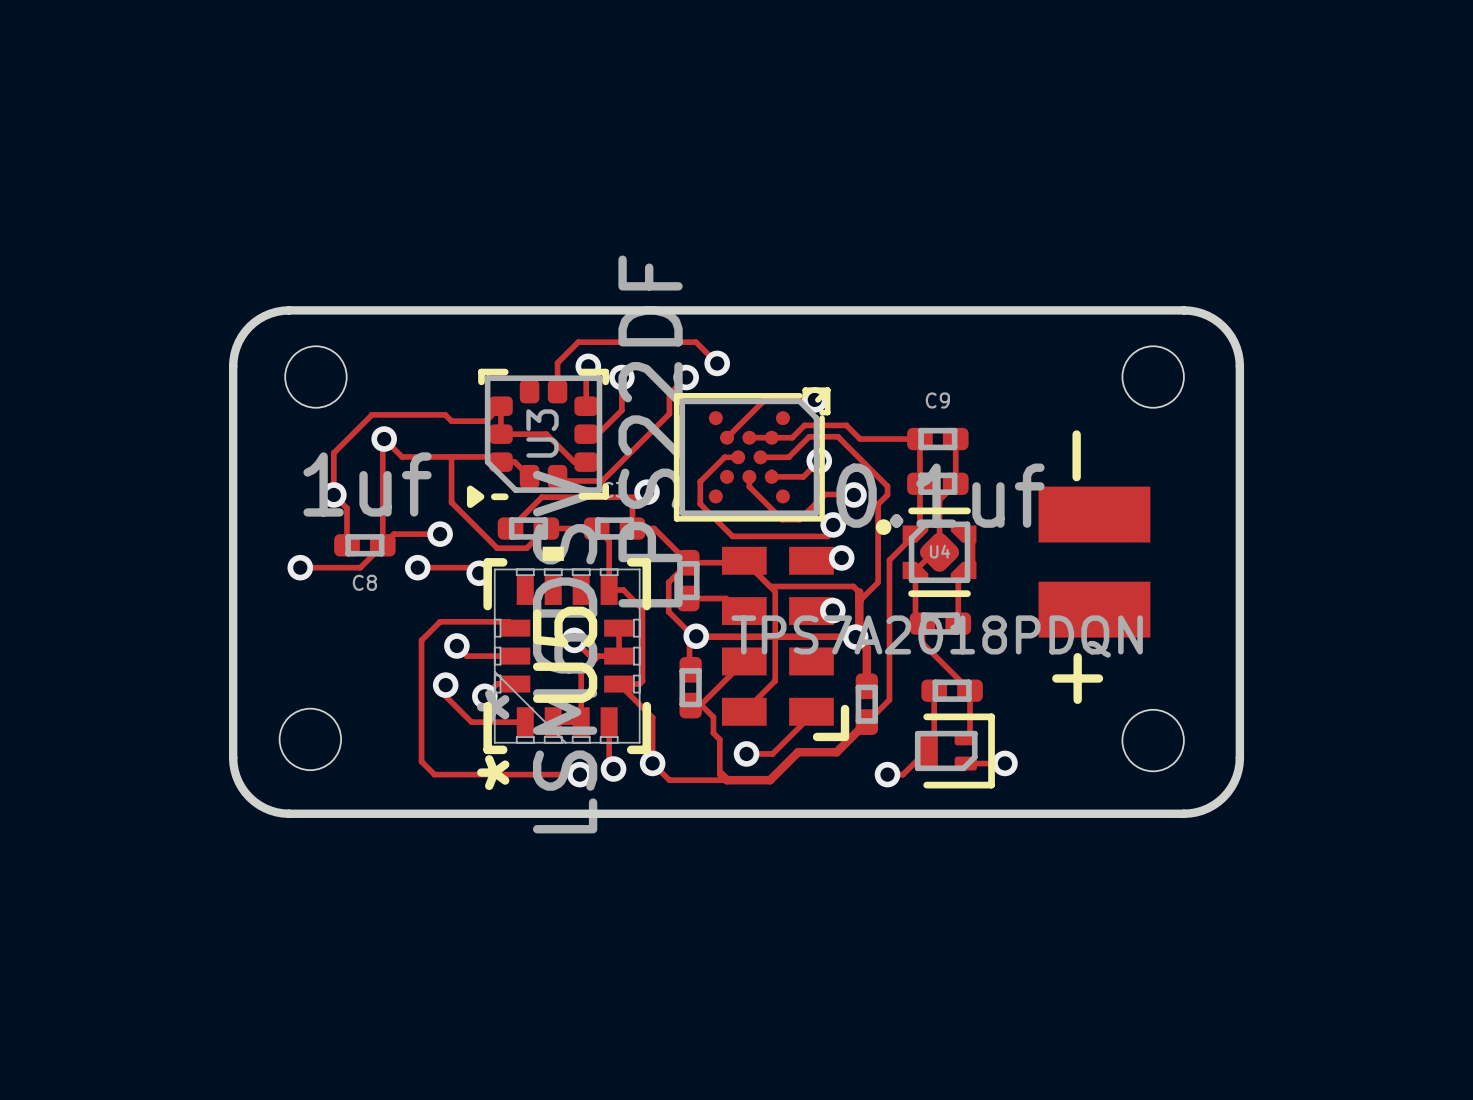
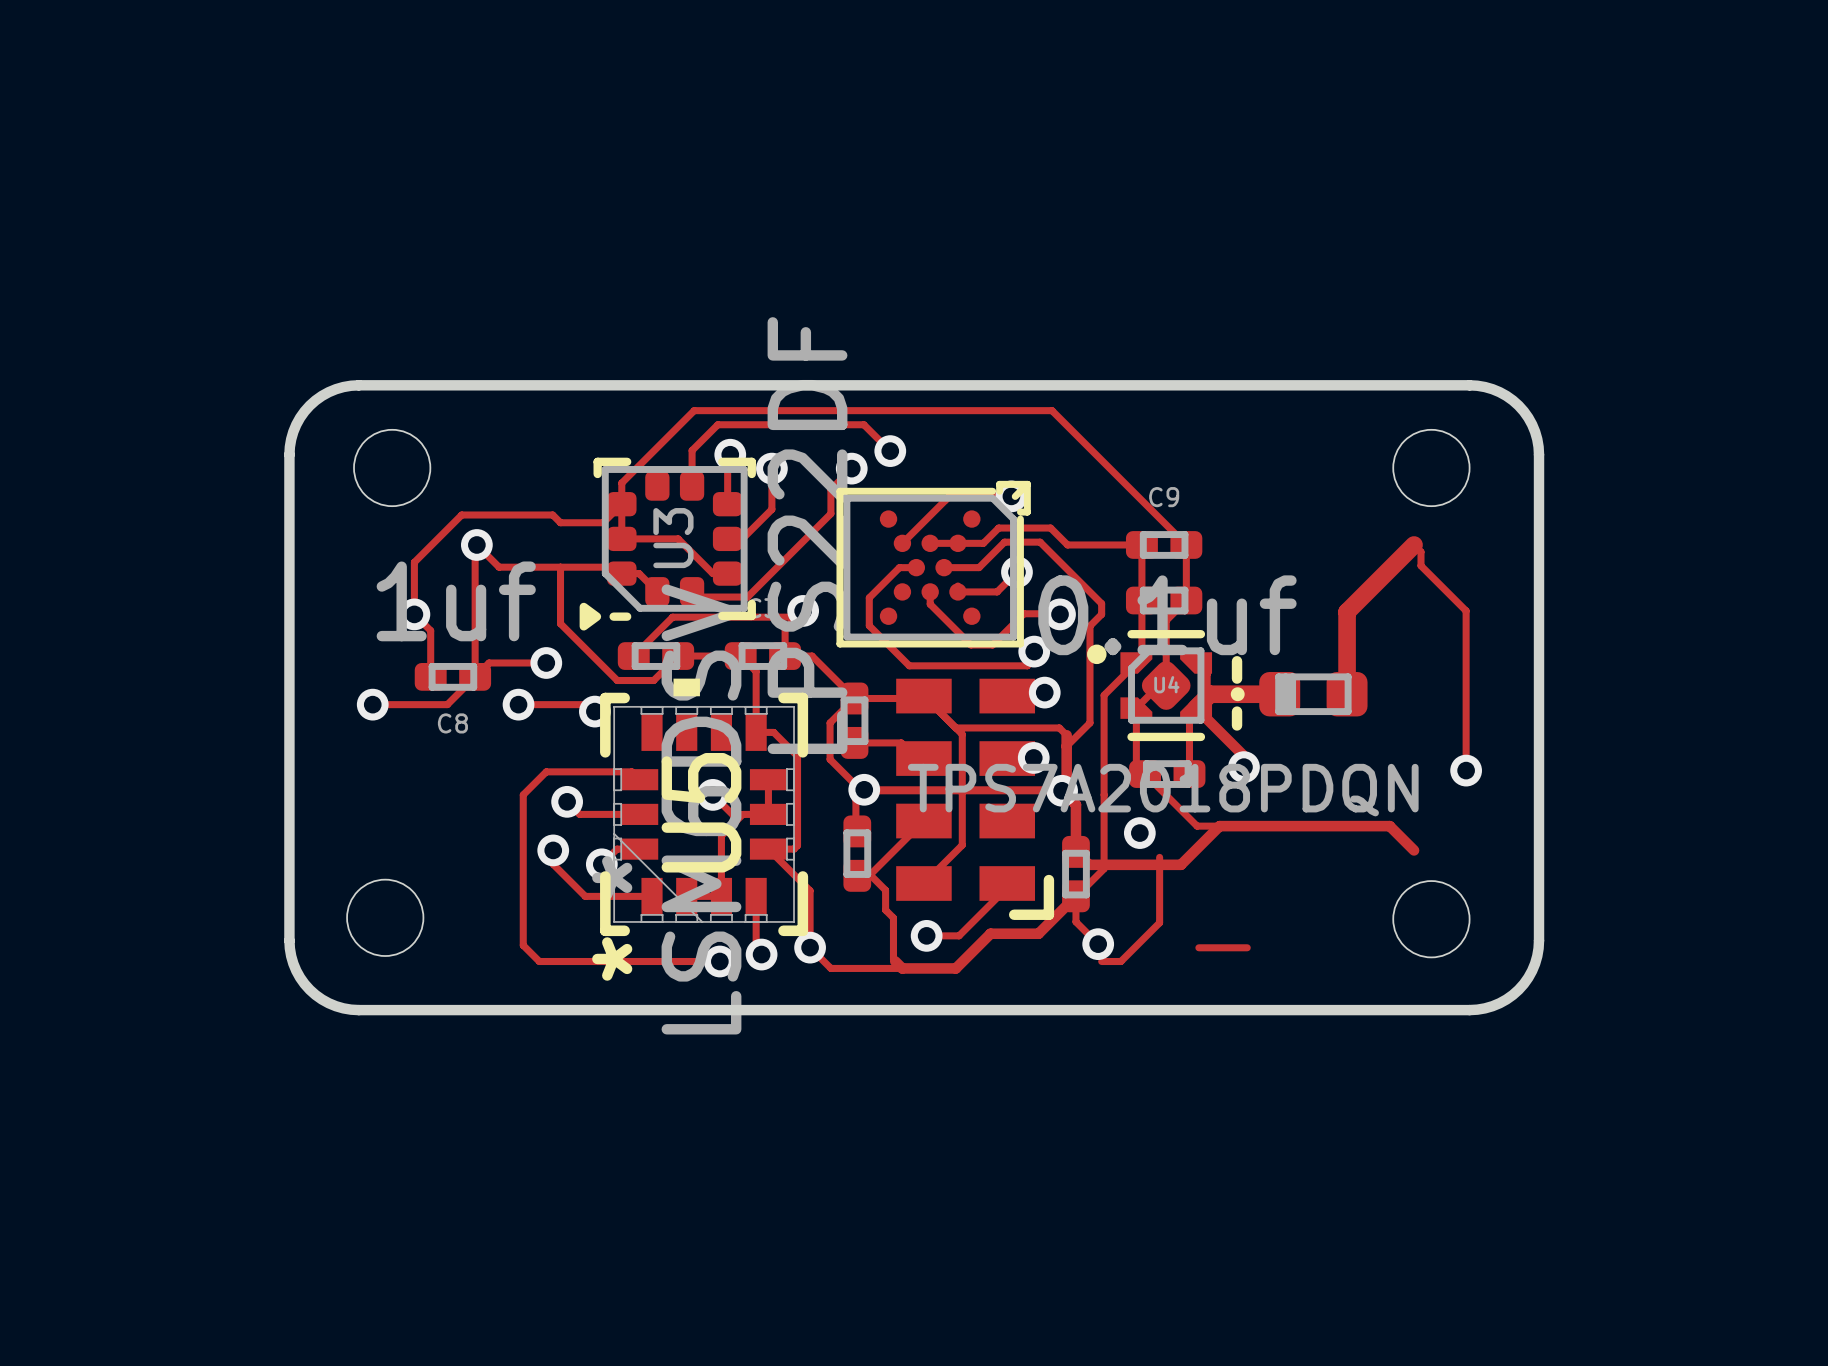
track: none -> (621, 504) (621, 483) (694, 410) (1052, 410) (1186, 544)
part footprint: [1038, 486, 1151, 638] -> [1230, 672, 1368, 717]
line: none -> (1237, 661) (1237, 678)
track: none -> (1279, 694) (1209, 694) (1196, 708) (1243, 756) (1243, 767)
track: none -> (1347, 694) (1347, 611) (1414, 544) (1421, 551) (1421, 565) (1466, 610) (1466, 770)
line: none -> (1237, 711) (1237, 725)
via: none -> (1243, 767)
via: none -> (1466, 770)
track: (922, 623) (922, 643) (970, 690) (970, 734) (965, 738) -> (1145, 774) (1197, 826) (1219, 826)
track: none -> (1219, 826) (1389, 826) (1414, 850)
track: none -> (1219, 826) (1180, 864) (1088, 864) (1075, 851)
via: none -> (1139, 833)
part: (952, 690) -> none
track: none -> (1075, 896) (1075, 921) (1098, 944)
part: (954, 750) -> none
via: (1004, 763) -> none
via position: (887, 774) -> (1098, 944)

